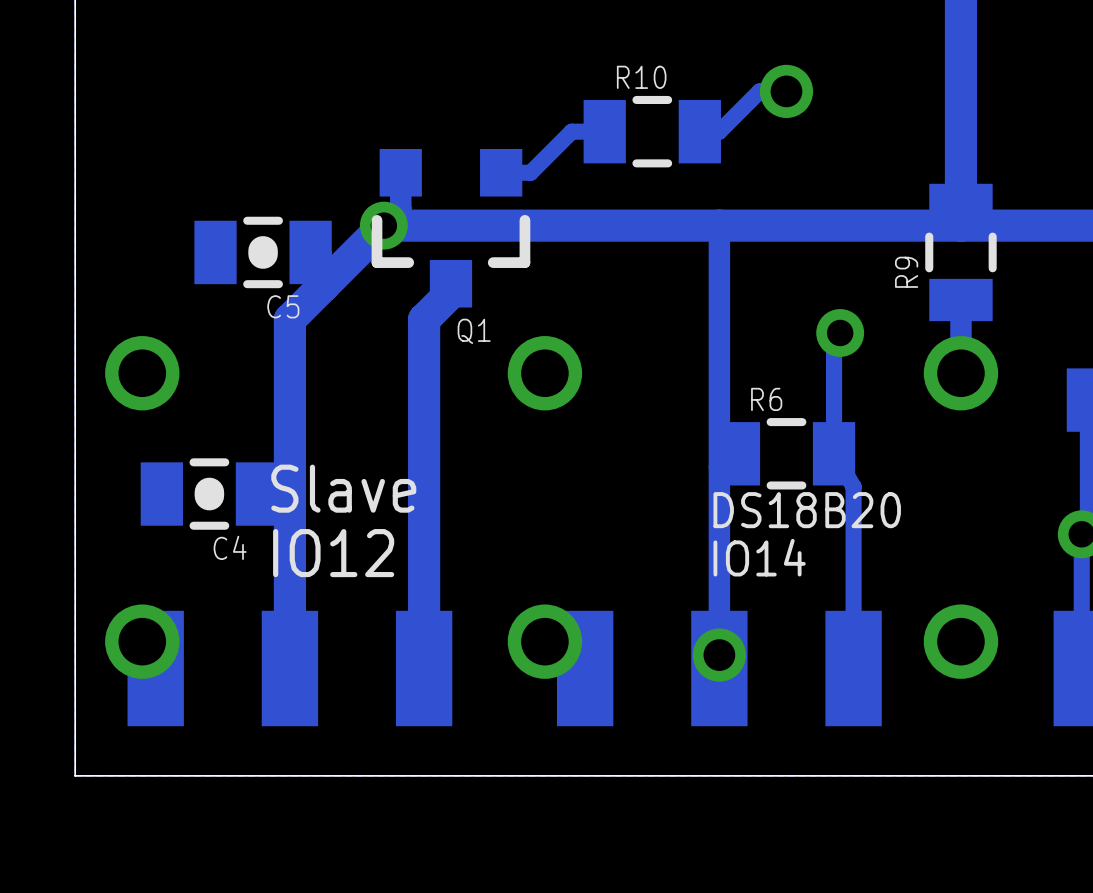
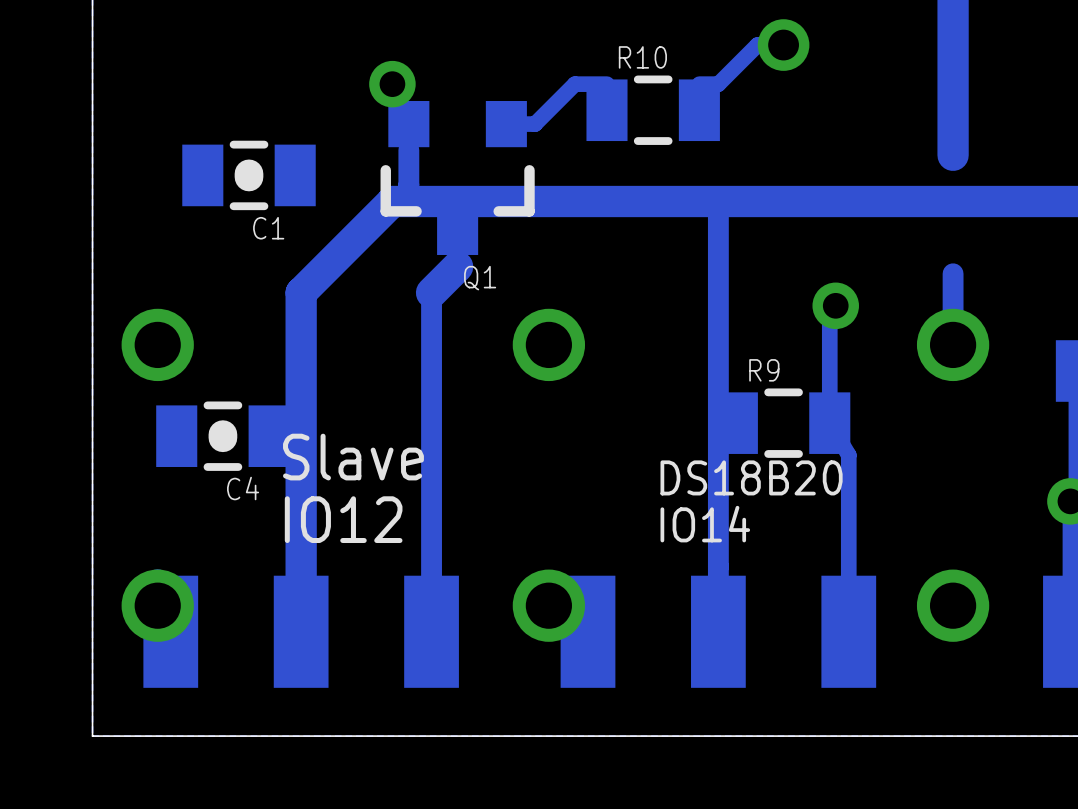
track: (786, 91) (759, 91) (719, 131) (699, 131) -> (783, 45) (757, 45) (718, 84) (699, 84)
via position: (786, 91) -> (783, 45)
track: (604, 131) (571, 131) (530, 172) (501, 172) -> (606, 84) (574, 84) (535, 124) (506, 124)
C1: none -> (249, 175)
via position: (383, 225) -> (392, 84)
Q1 position: (450, 228) -> (457, 177)
C5: (263, 252) -> none
R9: (960, 252) -> none
track width: thick (424, 319) (424, 668) -> thin (431, 292) (431, 631)
R6 name: R6 (766, 399) -> R9 (764, 370)
C4 position: (209, 494) -> (222, 436)
text position: DS18B20 (807, 510) -> DS18B20 (751, 477)
text position: IO14 (759, 557) -> IO14 (705, 524)
via: (719, 655) -> none

